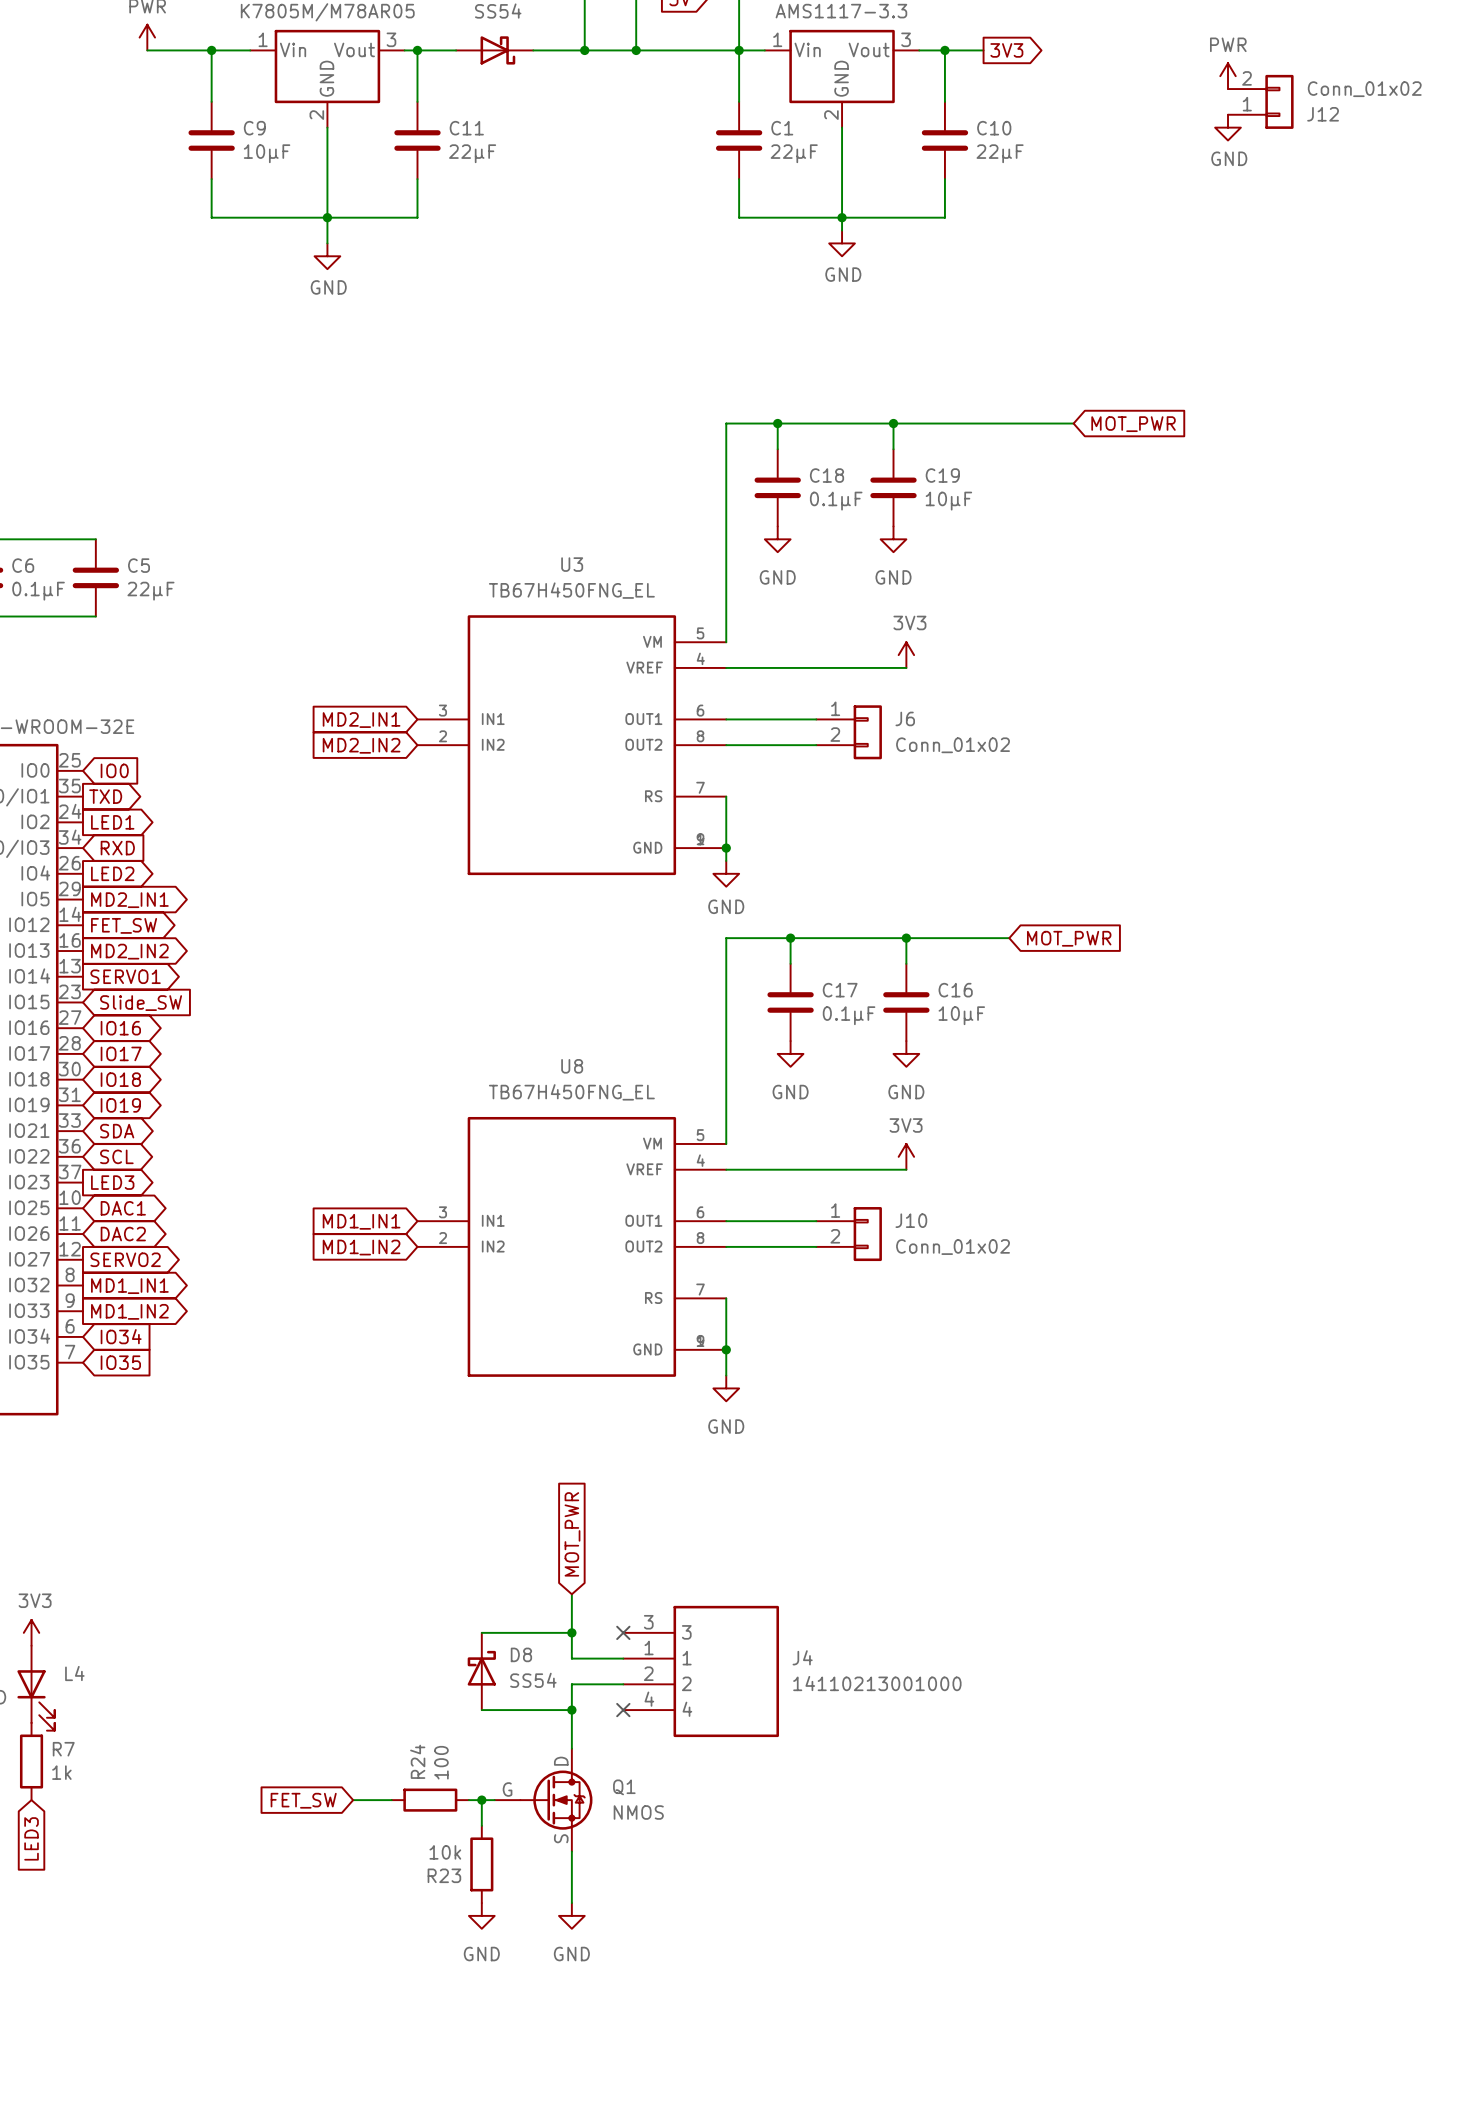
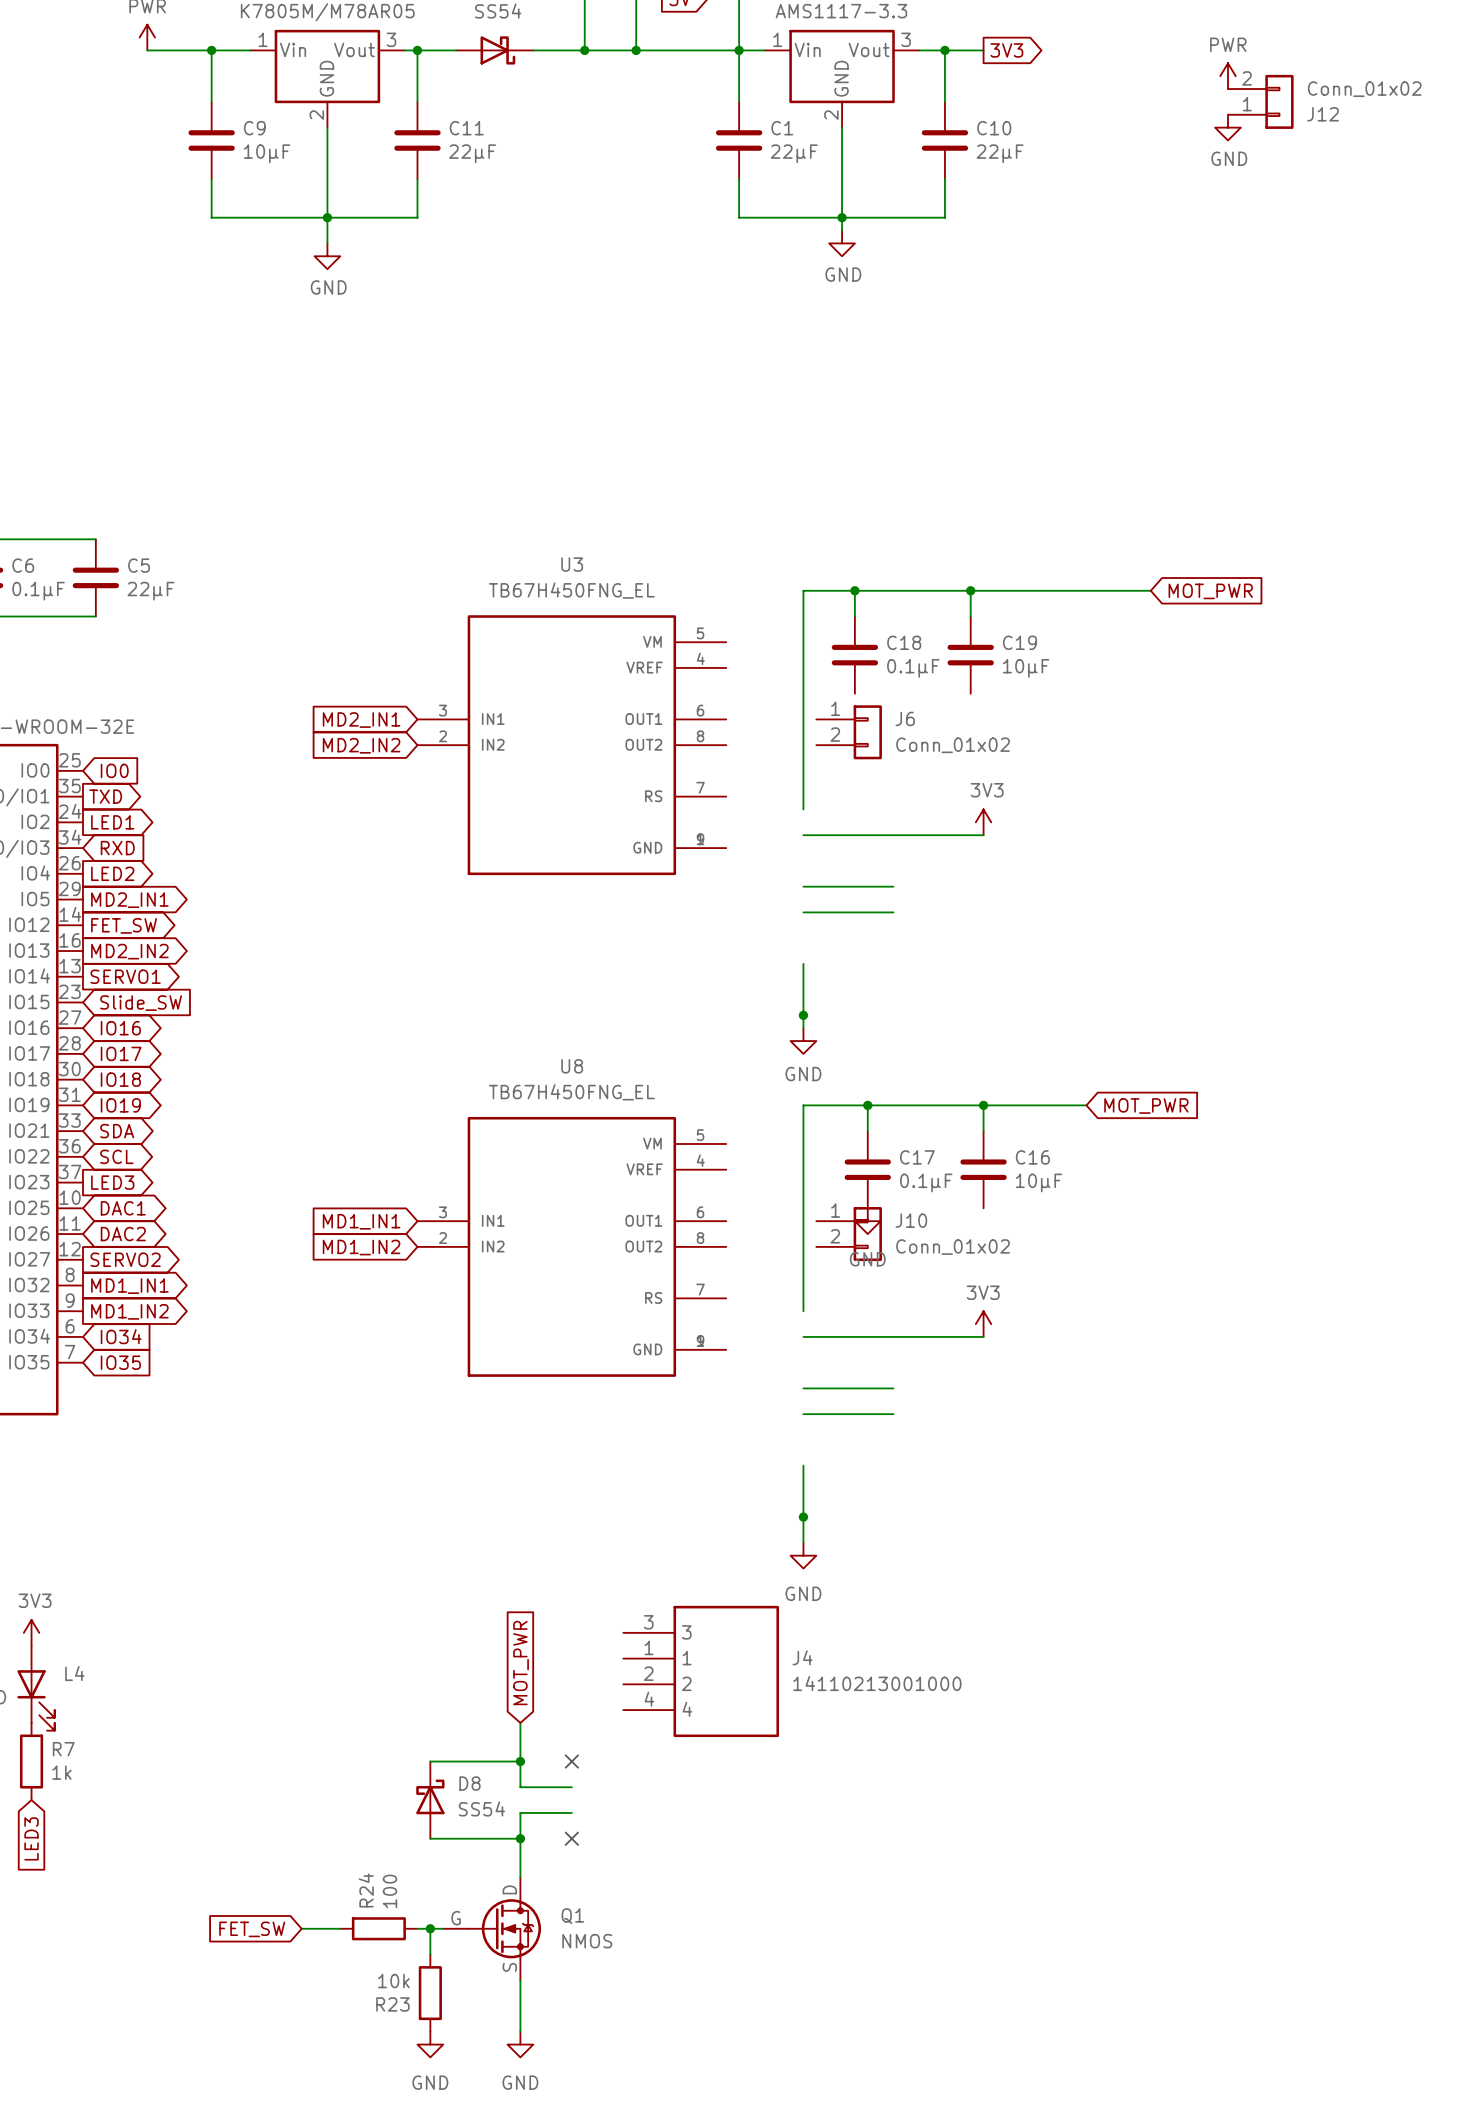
wire: (777, 423) (777, 449) -> (854, 590) (854, 616)
junction: (777, 423) -> none
wire: (893, 423) (893, 449) -> (970, 590) (970, 616)
junction: (893, 423) -> none
wire: (1073, 423) (726, 423) (726, 642) -> (1150, 590) (803, 590) (803, 809)
global label position: MOT_PWR (1133, 424) -> MOT_PWR (1210, 591)
C18 position: (777, 487) -> (854, 655)
C19 position: (893, 487) -> (970, 655)
power symbol: GND (777, 539) -> none
power symbol: GND (893, 539) -> none
junction: none -> (854, 590)
junction: none -> (970, 590)
power symbol: 3V3 (906, 655) -> none
wire: (726, 667) (906, 667) -> (803, 835) (983, 835)
wire: (726, 719) (816, 719) -> (803, 886) (893, 886)
wire: (726, 745) (816, 745) -> (803, 912) (893, 912)
wire: (726, 796) (726, 860) -> (803, 963) (803, 1028)
power symbol: none -> 3V3 (983, 822)
junction: (726, 848) -> none
power symbol: GND (726, 873) -> none
wire: (790, 938) (790, 963) -> (867, 1105) (867, 1131)
junction: (790, 938) -> none
wire: (906, 938) (906, 963) -> (983, 1105) (983, 1131)
junction: (906, 938) -> none
wire: (1009, 938) (726, 938) (726, 1143) -> (1086, 1105) (803, 1105) (803, 1311)
global label position: MOT_PWR (1069, 938) -> MOT_PWR (1146, 1106)
C17 position: (790, 1002) -> (867, 1169)
C16 position: (906, 1002) -> (983, 1169)
junction: none -> (803, 1015)
power symbol position: GND (790, 1053) -> GND (803, 1041)
power symbol: GND (906, 1053) -> none
power symbol text position: GND (790, 1092) -> GND (803, 1074)
junction: none -> (867, 1105)
junction: none -> (983, 1105)
power symbol: 3V3 (906, 1156) -> none
wire: (726, 1169) (906, 1169) -> (803, 1336) (983, 1336)
wire: (726, 1221) (816, 1221) -> (803, 1388) (893, 1388)
power symbol: none -> GND (867, 1221)
wire: (726, 1246) (816, 1246) -> (803, 1414) (893, 1414)
wire: (726, 1298) (726, 1375) -> (803, 1465) (803, 1542)
power symbol: none -> 3V3 (983, 1324)
junction: (726, 1349) -> none
power symbol: GND (726, 1388) -> none
junction: none -> (803, 1517)
global label position: MOT_PWR (572, 1534) -> MOT_PWR (521, 1663)
power symbol: none -> GND (803, 1555)
wire: (571, 1594) (571, 1658) (623, 1658) -> (520, 1722) (520, 1787) (571, 1787)
wire: (481, 1632) (571, 1632) -> (430, 1761) (520, 1761)
junction: (571, 1632) -> none
no-connect mark: (623, 1632) -> none
D8 position: (481, 1671) -> (430, 1800)
wire: (623, 1684) (571, 1684) (571, 1748) -> (571, 1812) (520, 1812) (520, 1877)
wire: (481, 1710) (571, 1710) -> (430, 1838) (520, 1838)
junction: (571, 1710) -> none
no-connect mark: (623, 1710) -> none
junction: none -> (520, 1761)
no-connect mark: none -> (571, 1761)
global label position: FET_SW (303, 1800) -> FET_SW (252, 1929)
wire: (353, 1800) (391, 1800) -> (301, 1928) (340, 1928)
R24 position: (430, 1800) -> (378, 1928)
wire: (468, 1800) (494, 1800) -> (417, 1928) (443, 1928)
wire: (481, 1800) (481, 1825) -> (430, 1928) (430, 1954)
junction: (481, 1800) -> none
Q1 position: (543, 1800) -> (492, 1928)
junction: none -> (520, 1838)
no-connect mark: none -> (571, 1838)
wire: (571, 1851) (571, 1903) -> (520, 1980) (520, 2031)
R23 position: (481, 1864) -> (430, 1993)
power symbol: GND (481, 1915) -> none
power symbol: GND (571, 1915) -> none
junction: none -> (430, 1928)
power symbol: none -> GND (430, 2044)
power symbol: none -> GND (520, 2044)

